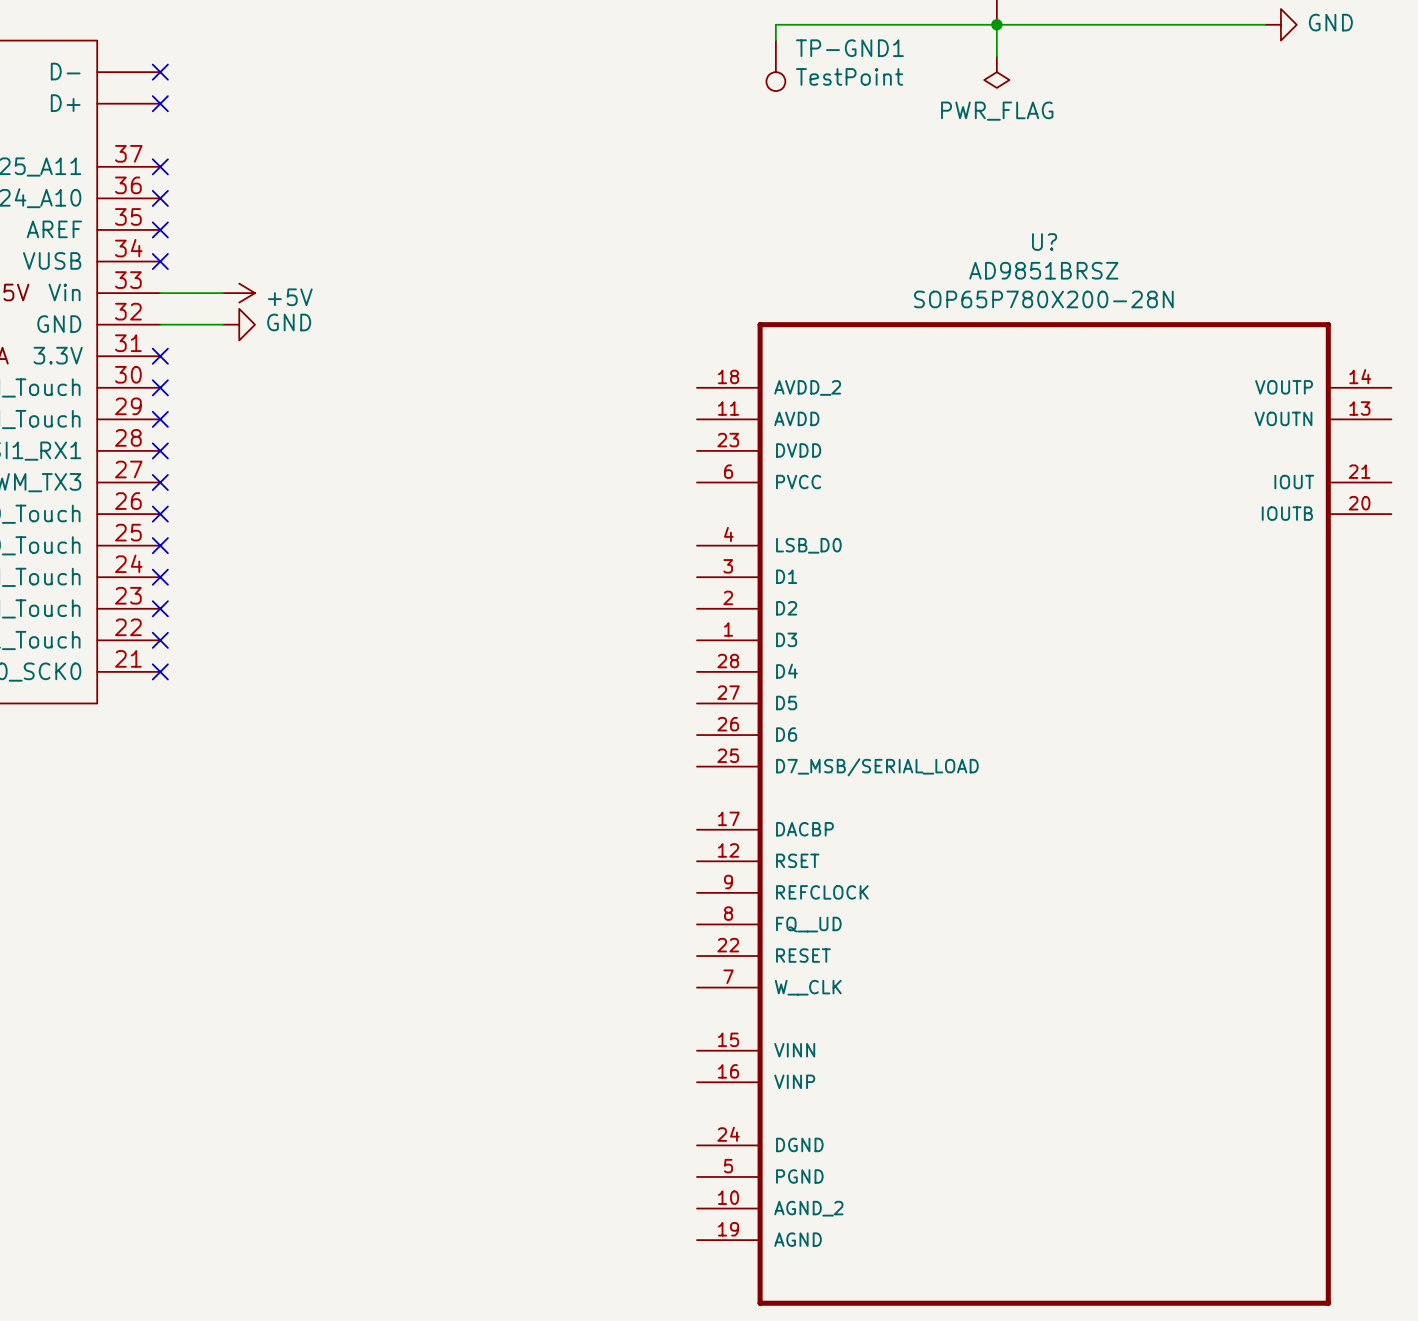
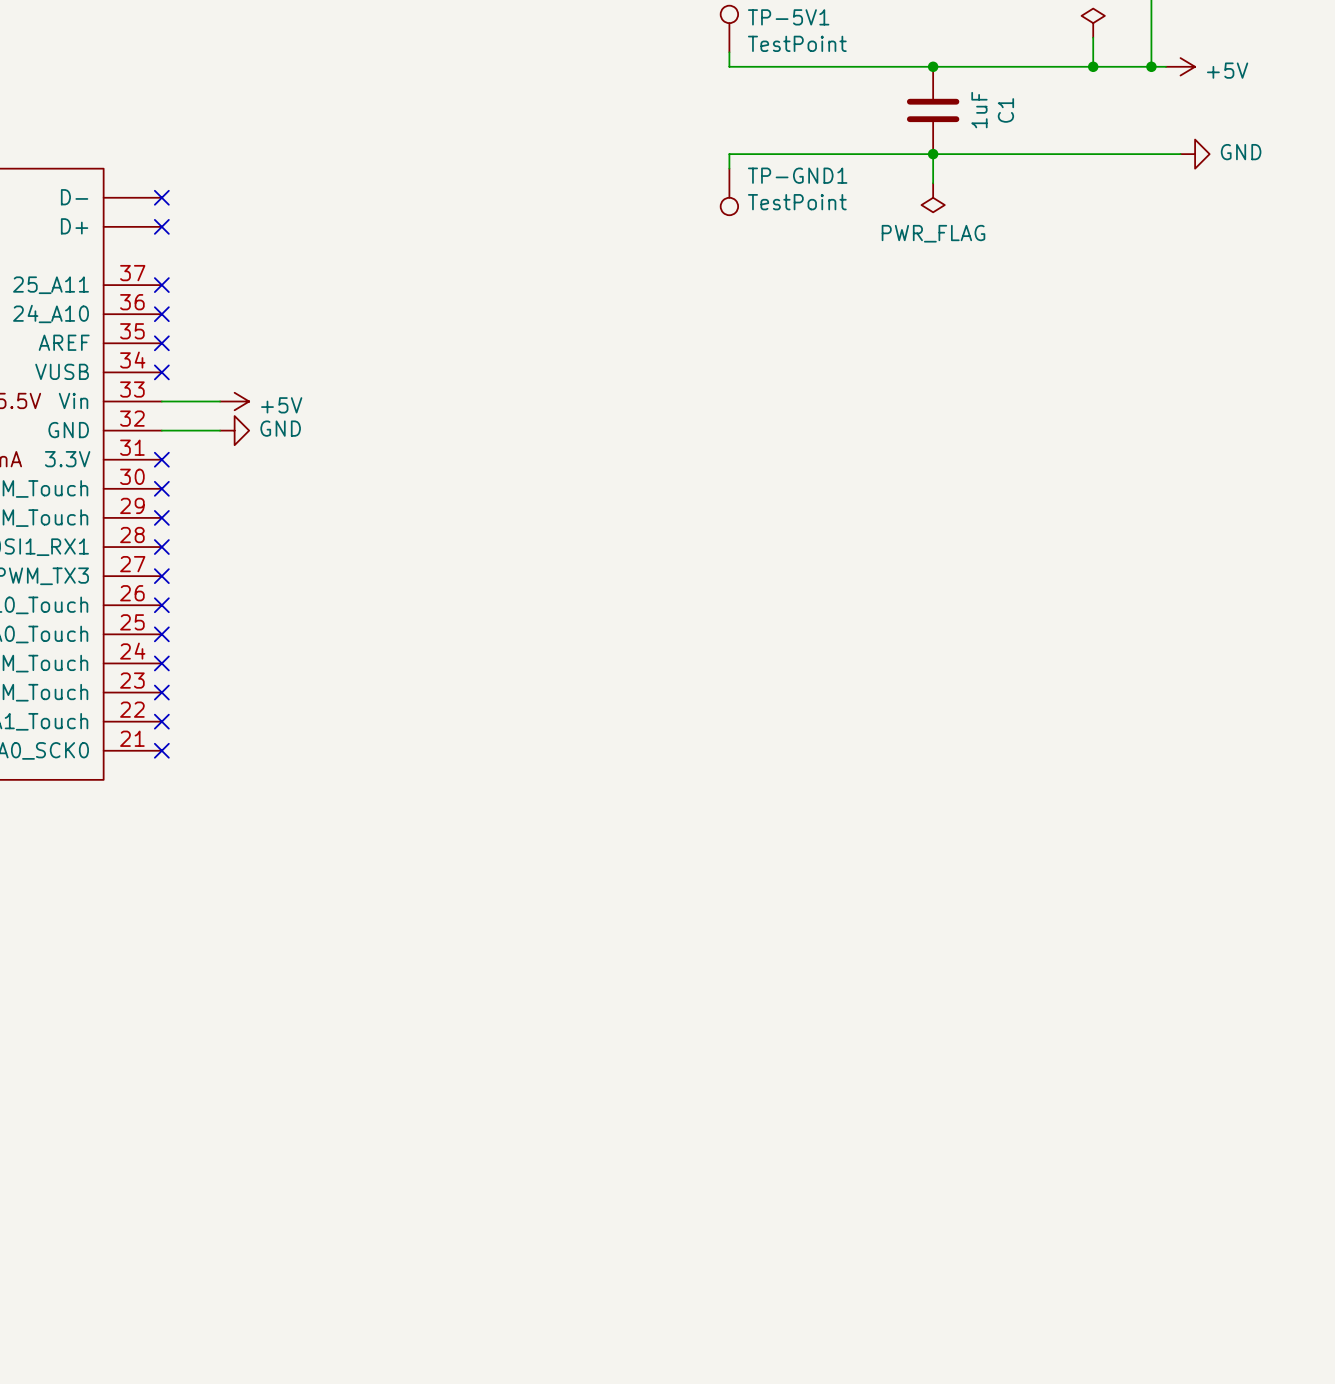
U?: AD9851BRSZ (1044, 813) -> none

